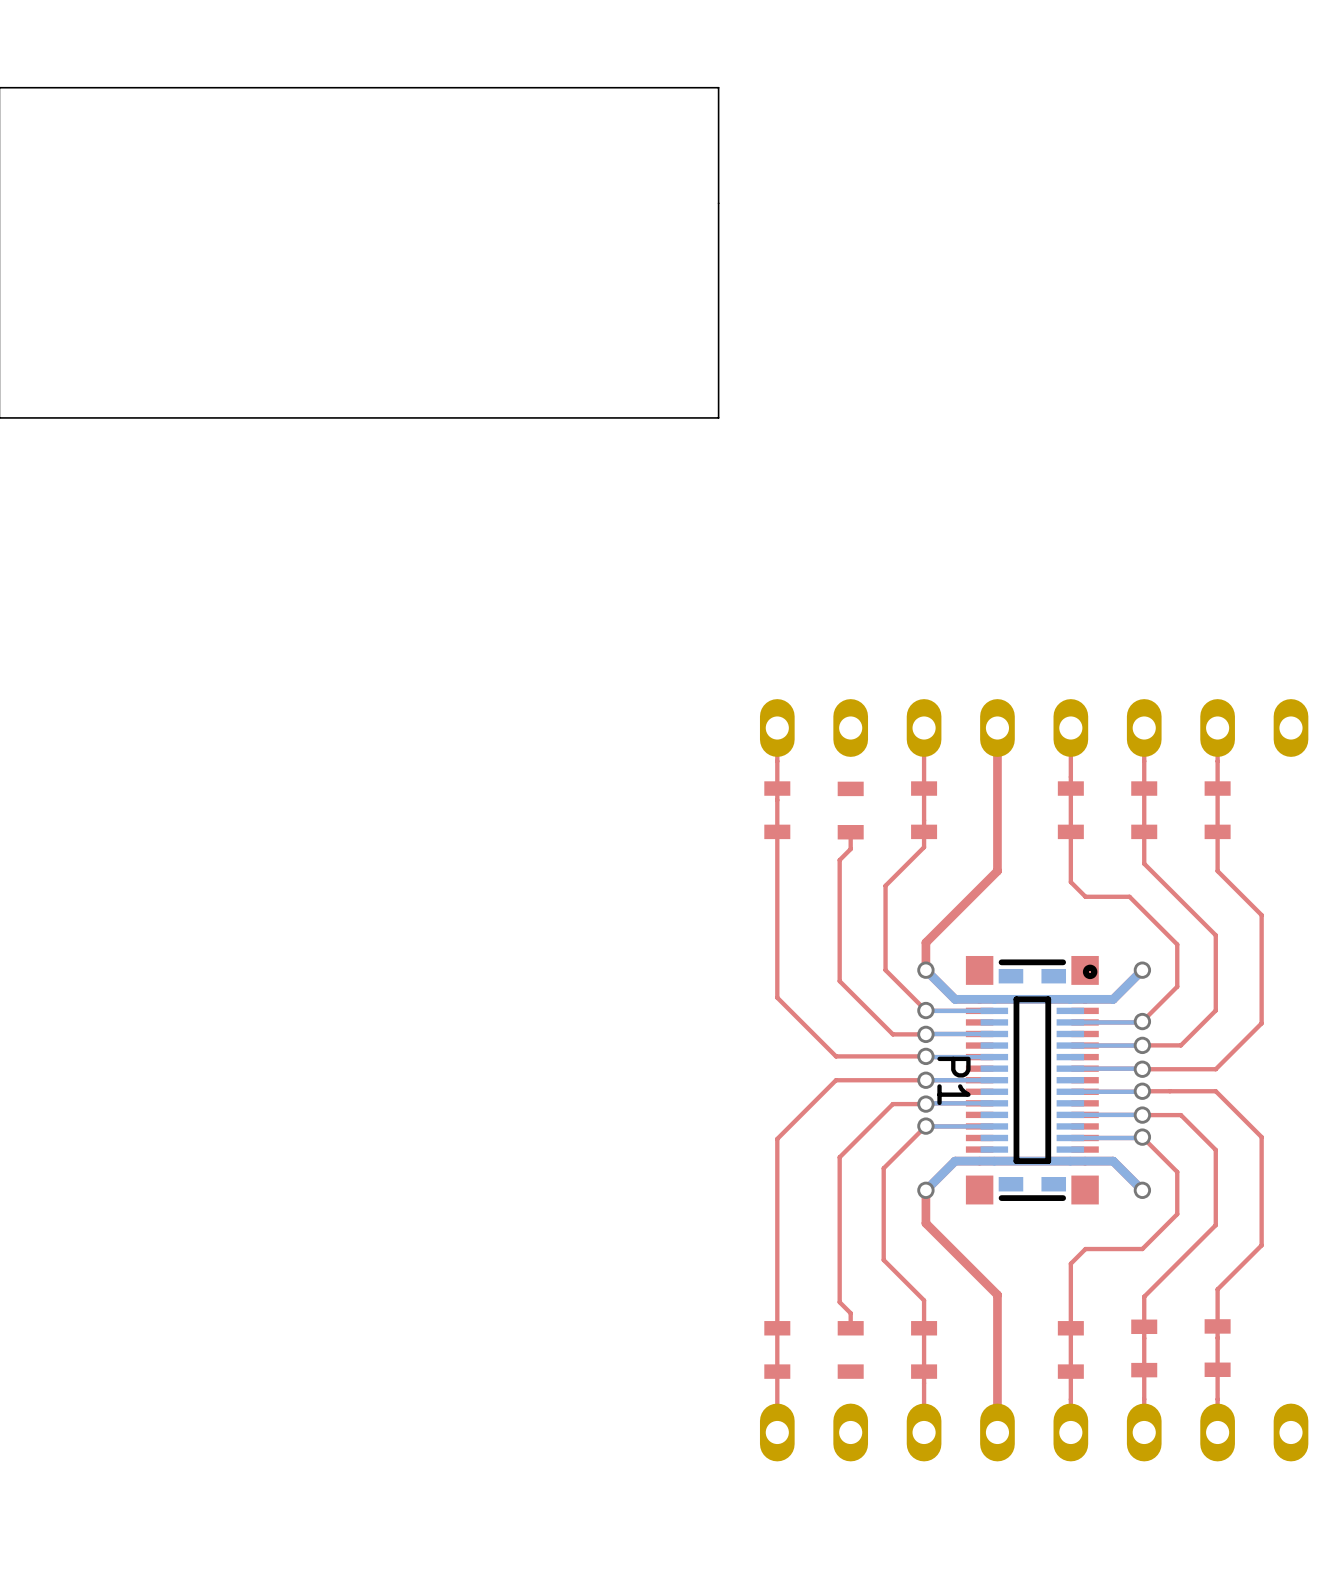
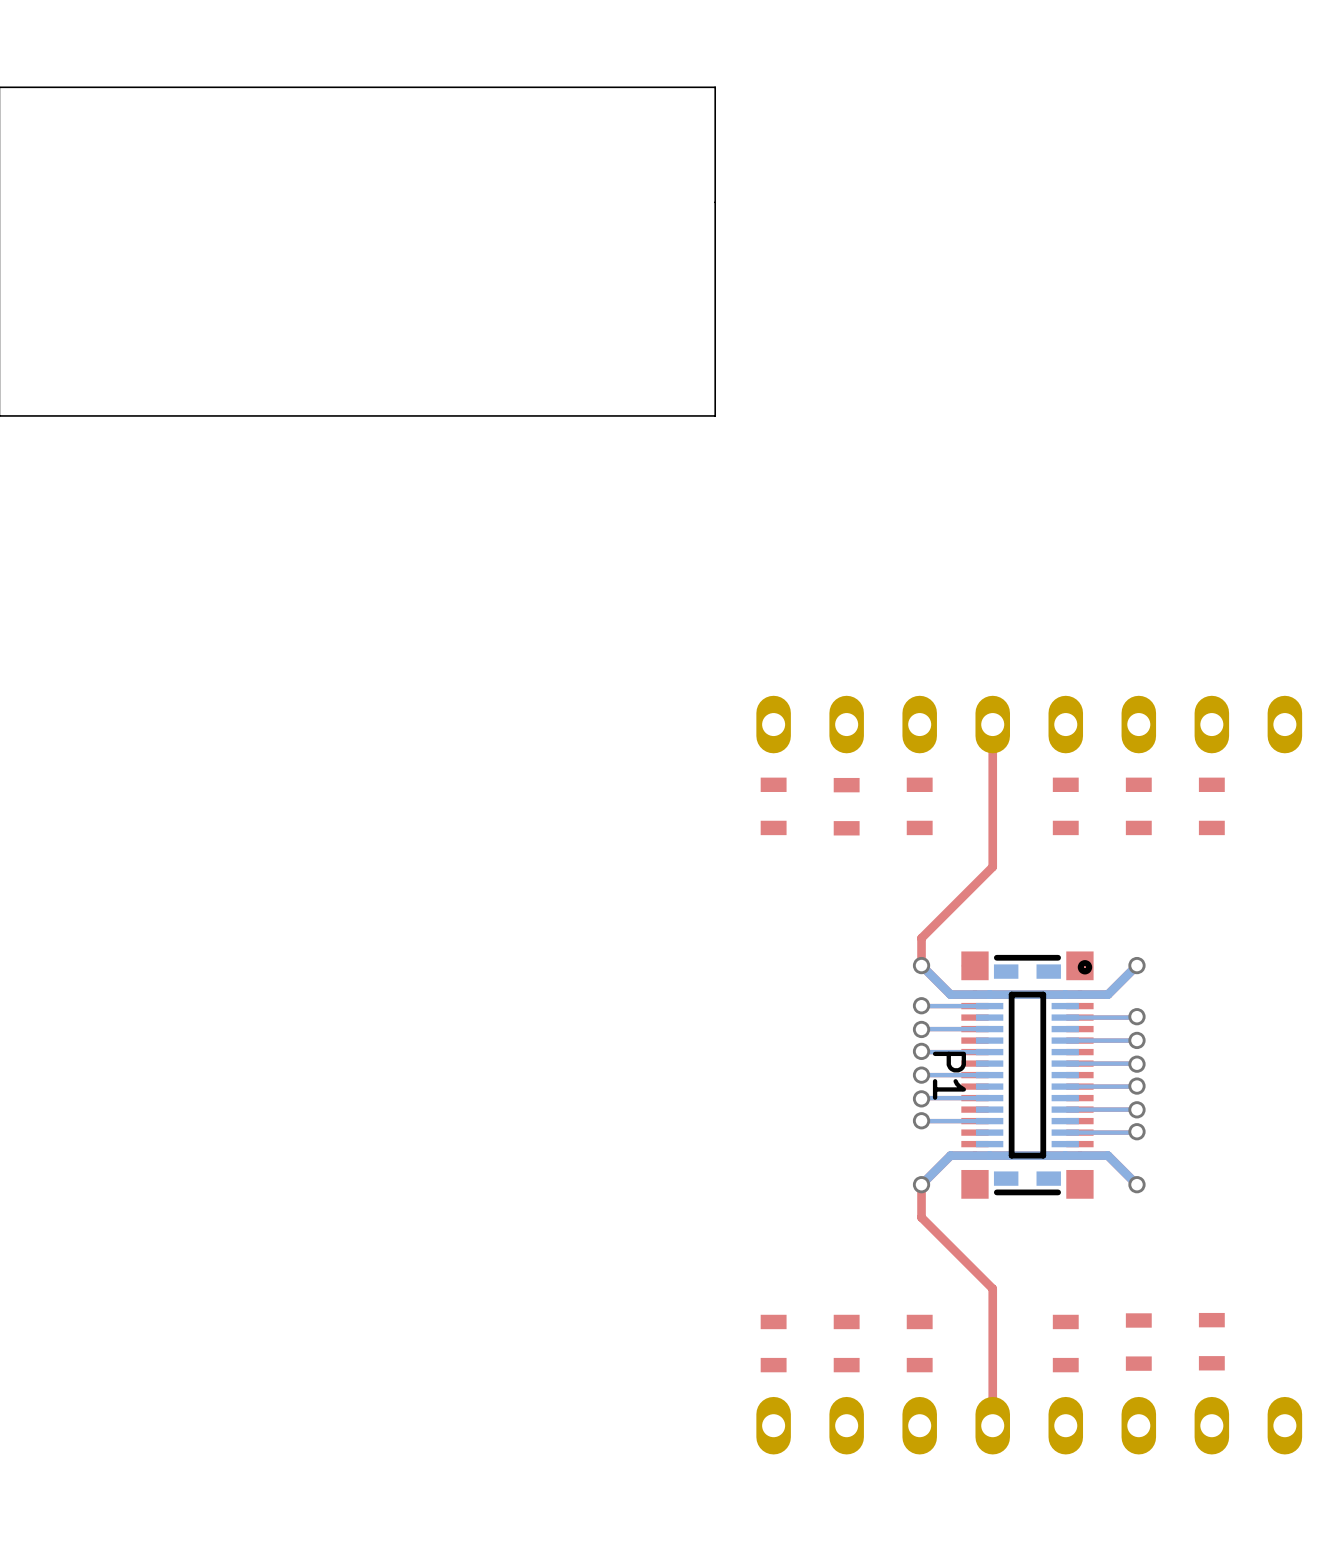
top track: (777, 728) (777, 997) (836, 1056) (925, 1056) -> none
top track: (924, 728) (924, 847) (885, 885) (885, 970) (925, 1010) -> none
top track: (1070, 728) (1070, 882) (1085, 896) (1129, 896) (1177, 944) (1177, 986) (1142, 1021) -> none
top track: (1144, 728) (1144, 863) (1215, 935) (1215, 1010) (1180, 1045) (1142, 1045) -> none
top track: (1217, 728) (1217, 871) (1261, 915) (1261, 1023) (1215, 1069) (1142, 1069) -> none
top track: (850, 832) (850, 849) (839, 860) (839, 981) (892, 1034) (925, 1034) -> none
top track: (925, 1080) (836, 1080) (777, 1138) (777, 1432) -> none
top track: (1142, 1091) (1215, 1091) (1261, 1137) (1261, 1245) (1217, 1289) (1217, 1432) -> none
top track: (925, 1104) (892, 1104) (839, 1157) (839, 1302) (850, 1313) (850, 1328) -> none
top track: (1142, 1114) (1180, 1115) (1215, 1149) (1215, 1225) (1144, 1296) (1144, 1432) -> none
top track: (925, 1126) (883, 1168) (883, 1260) (924, 1300) (924, 1432) -> none
top track: (1142, 1137) (1177, 1171) (1177, 1214) (1142, 1249) (1085, 1249) (1070, 1263) (1070, 1432) -> none

